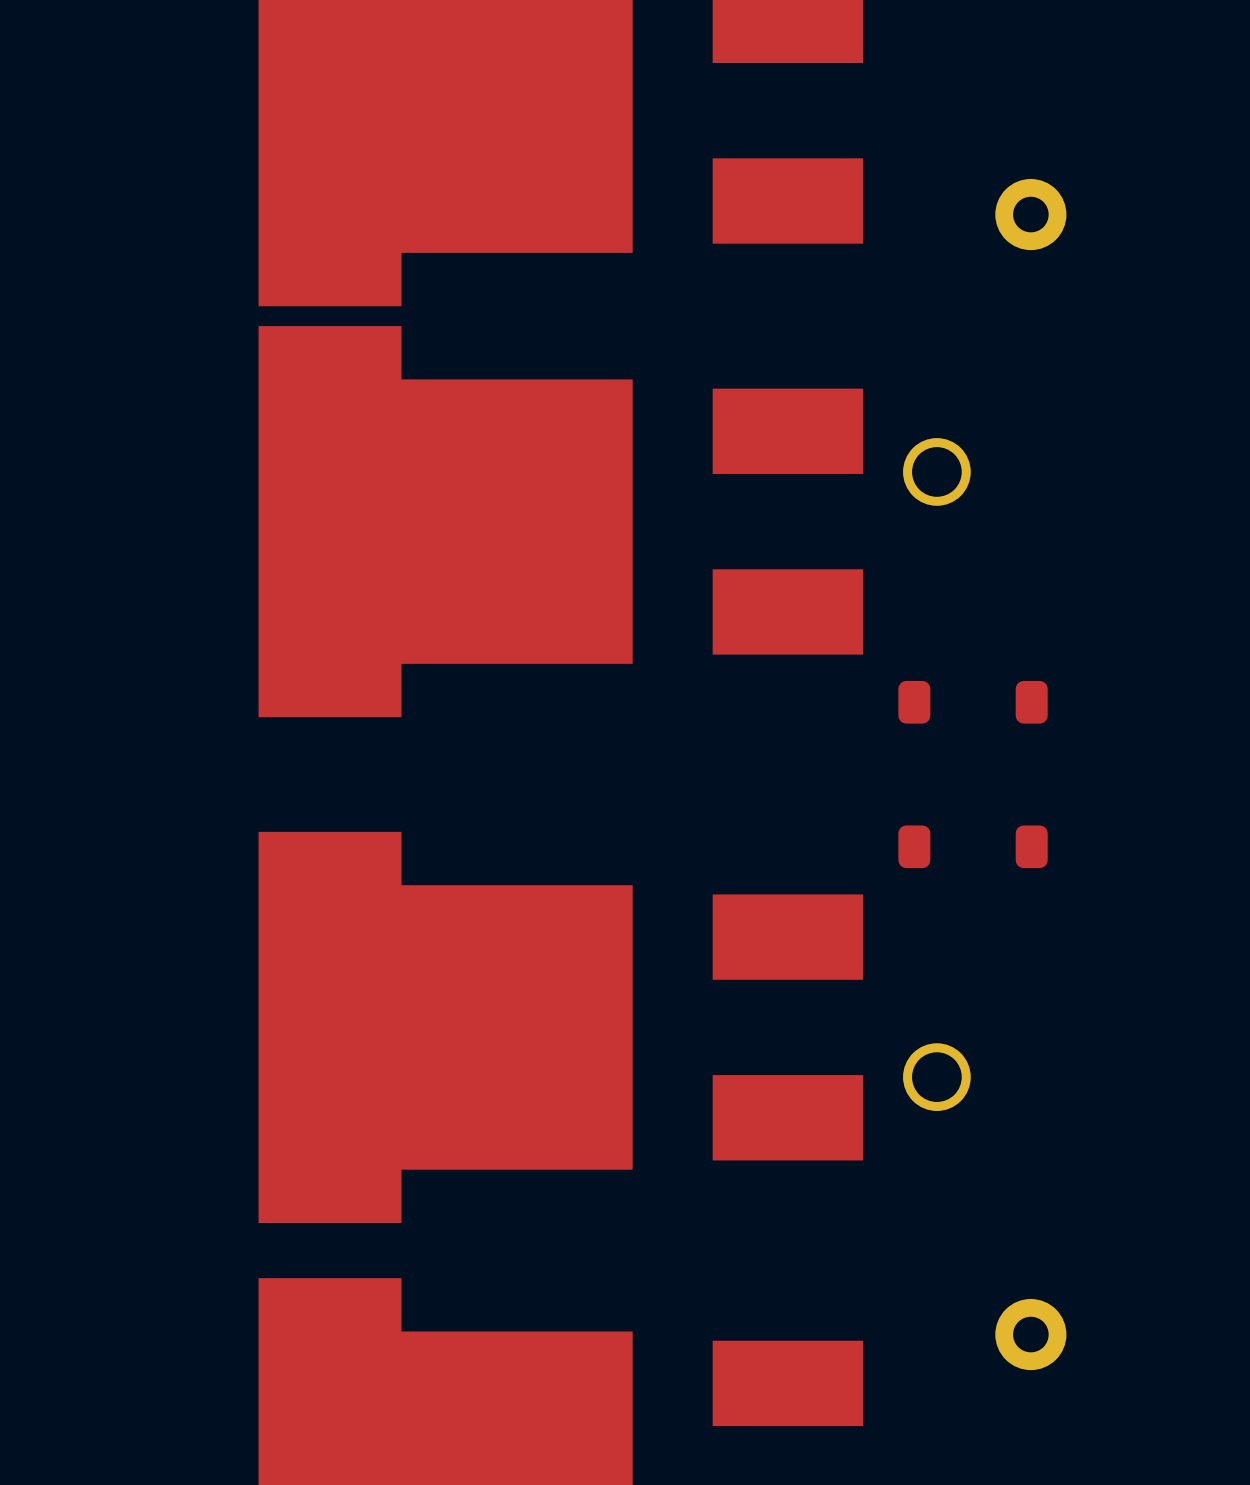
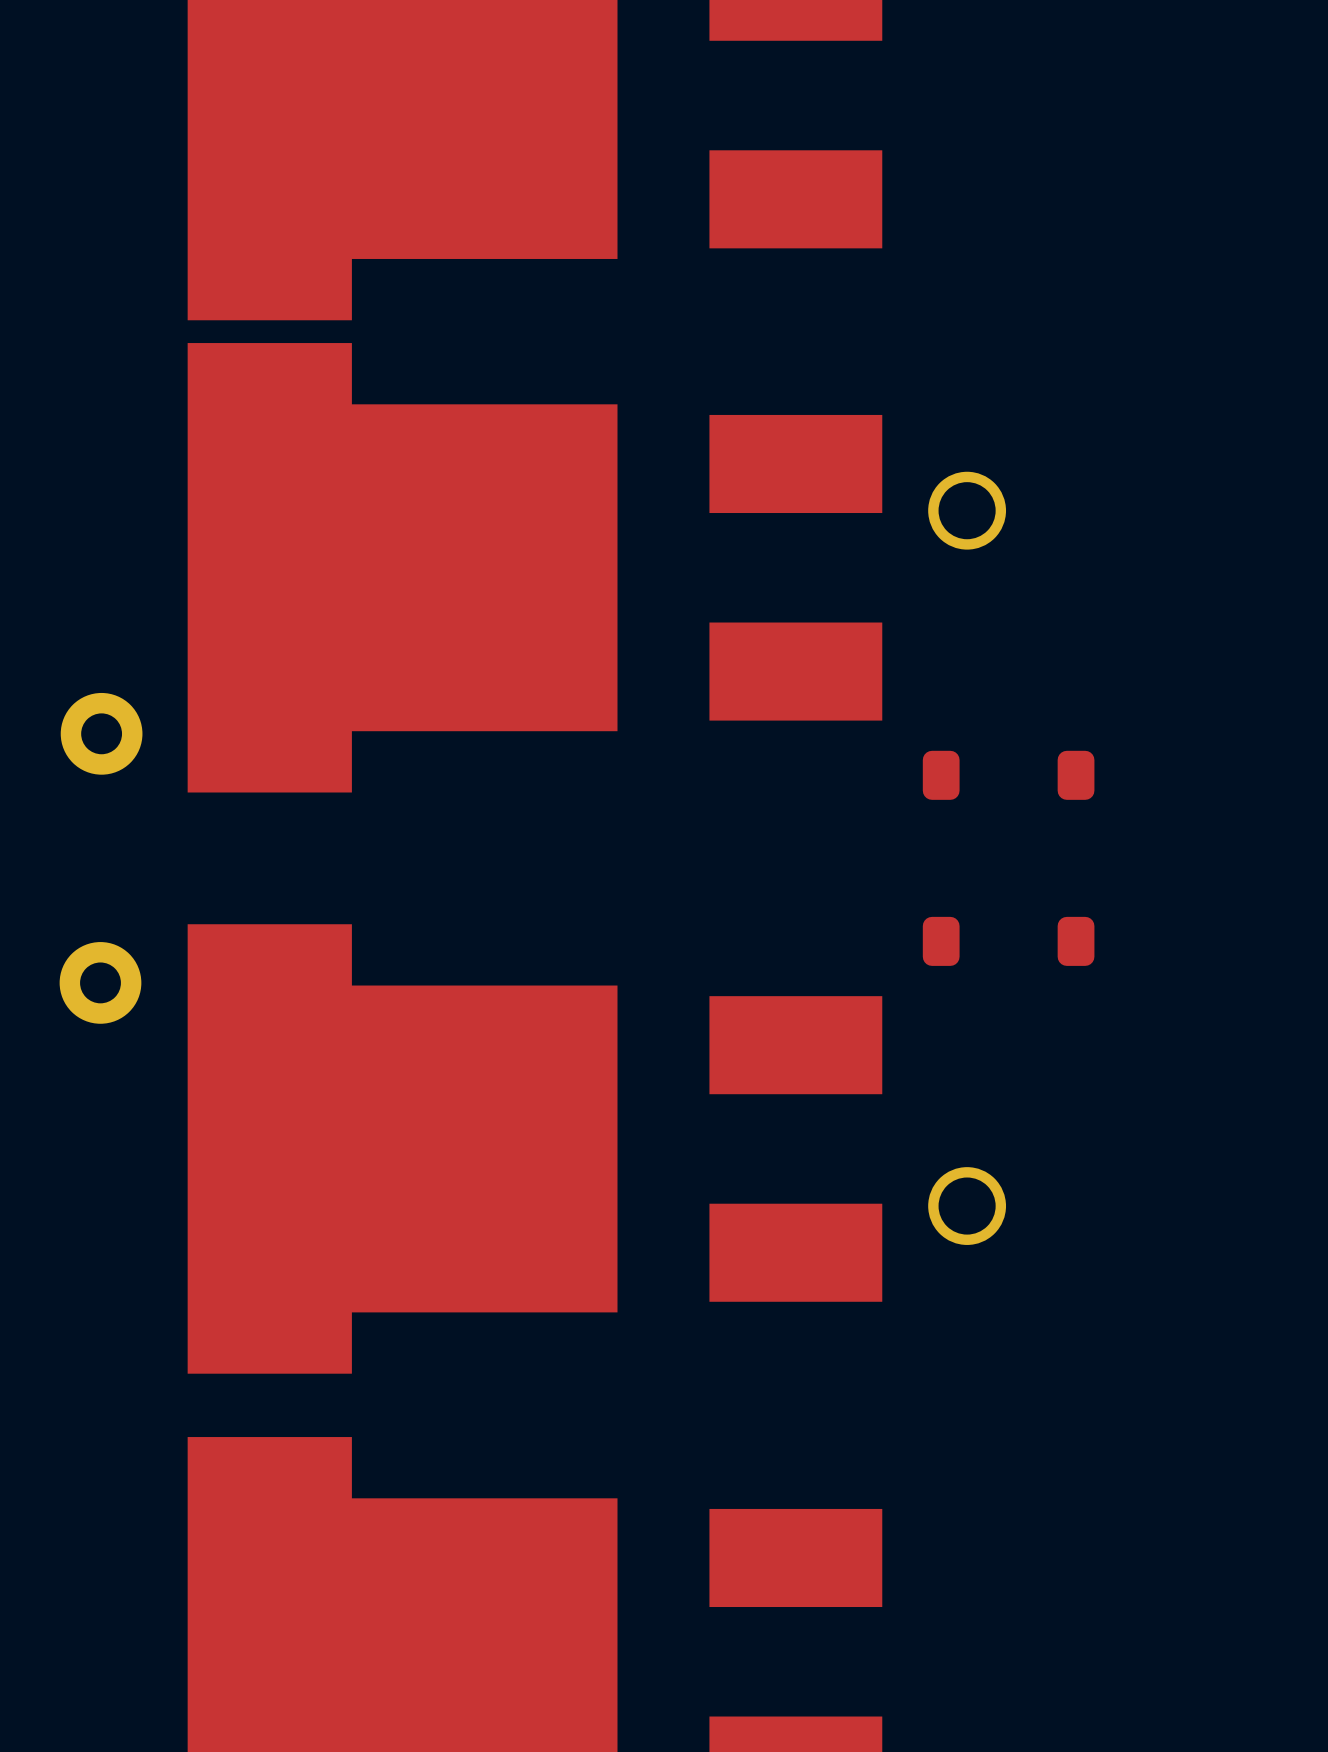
part: (1030, 214) -> none
part: none -> (101, 733)
part: none -> (100, 982)
part: (1030, 1334) -> none

